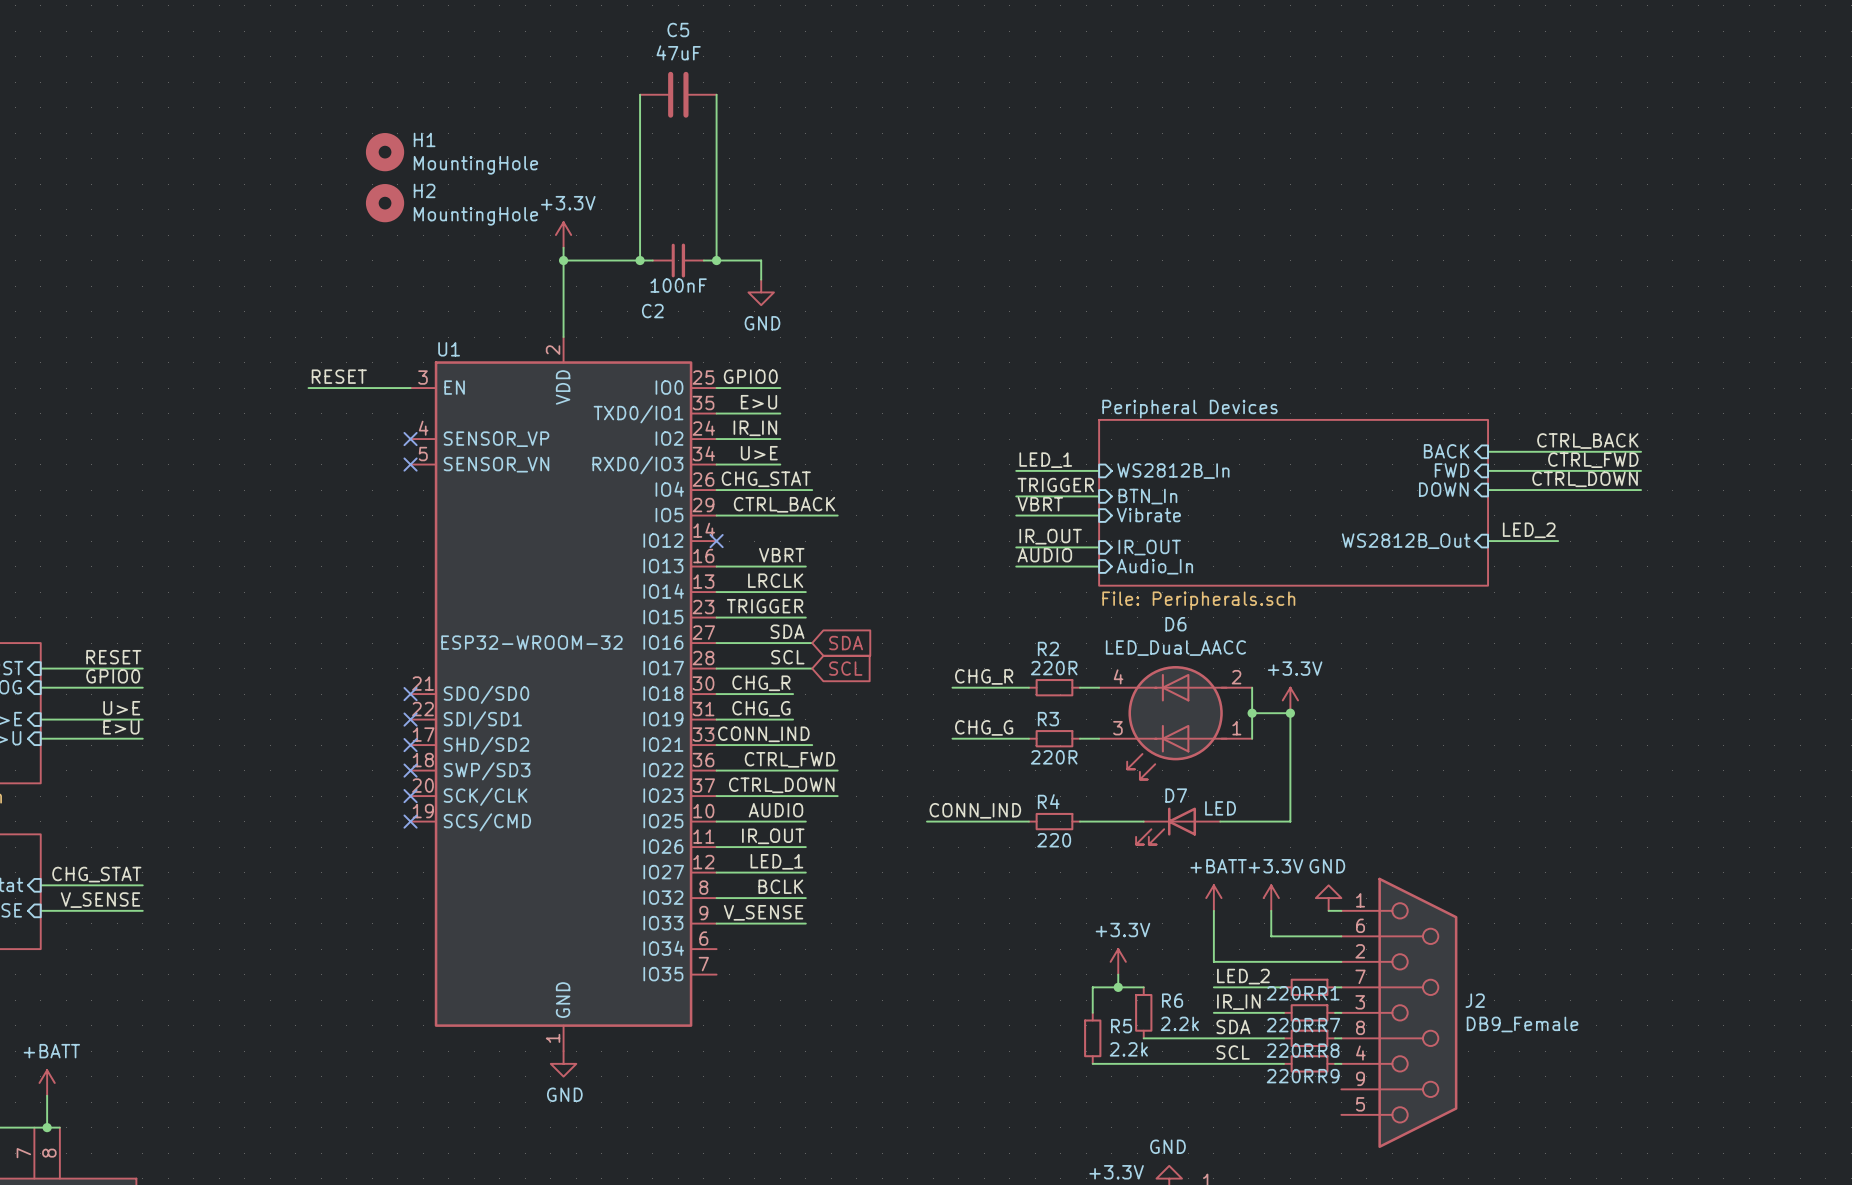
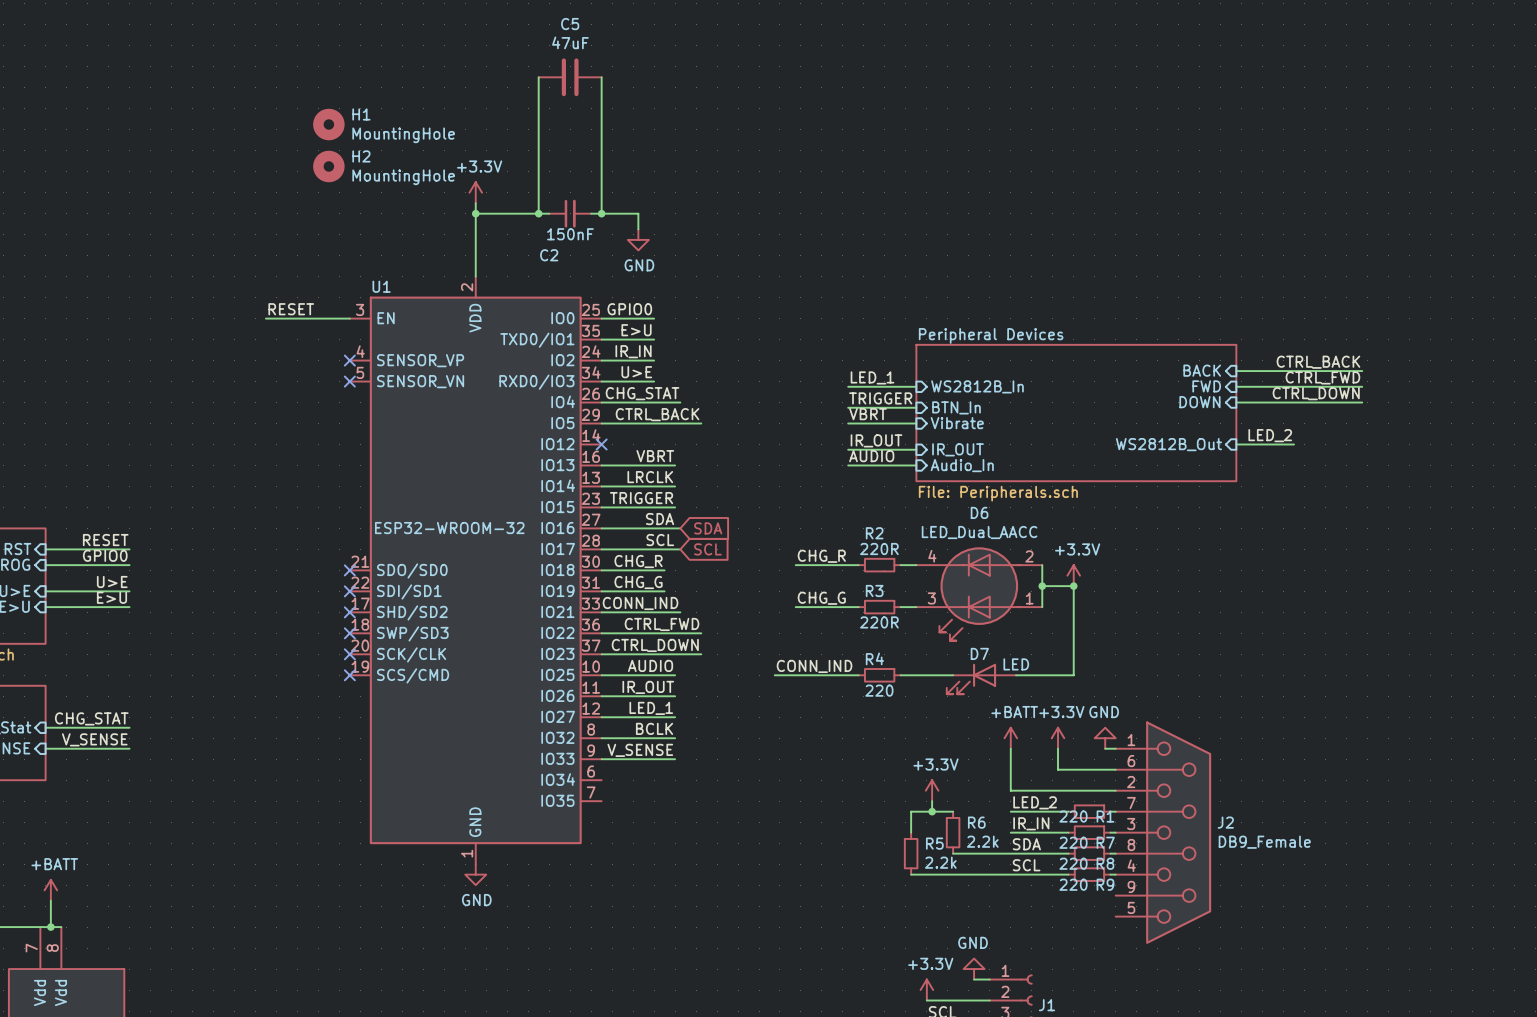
C2 value: 100nF (678, 285) -> 150nF (570, 234)
R1 value: 220R (1290, 993) -> 220 (1073, 816)
R7 value: 220R (1290, 1025) -> 220 (1073, 842)
R8 value: 220R (1290, 1050) -> 220 (1073, 863)
R9 value: 220R (1290, 1076) -> 220 (1073, 884)

